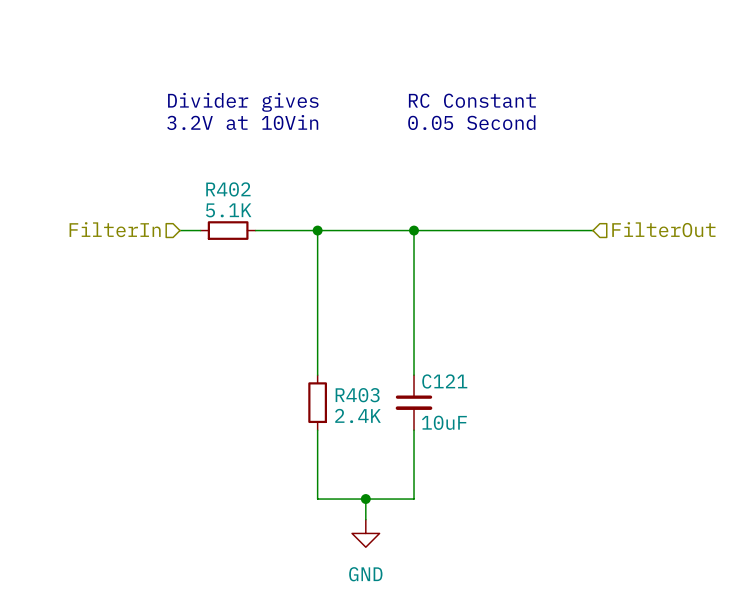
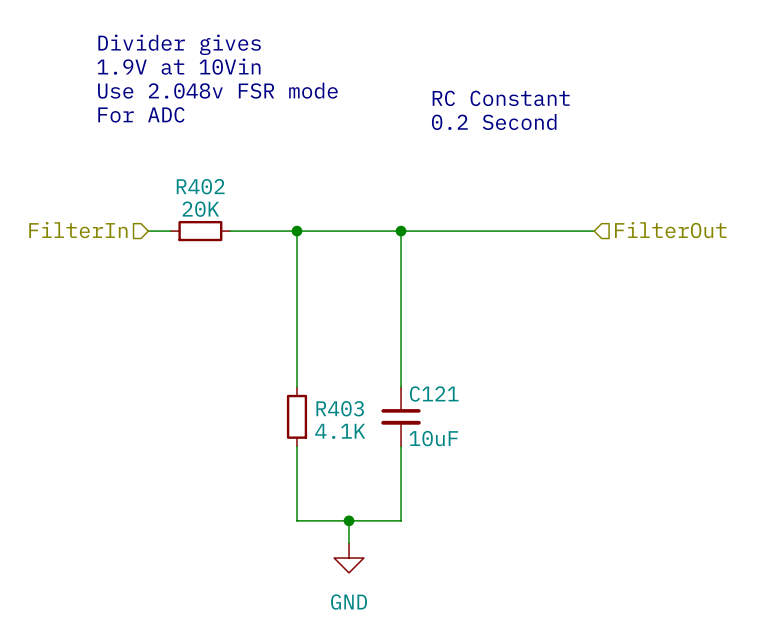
text: none -> 1.9V at 10Vin (179, 66)
text: none -> Use 2.048v FSR mode (217, 90)
text position: RC Constant (472, 100) -> RC Constant (501, 98)
text position: Divider gives (243, 102) -> Divider gives (179, 44)
text: none -> For ADC (141, 114)
text: 3.2V at 10Vin (242, 122) -> none
text: 0.05 Second (471, 122) -> 0.2 Second (494, 121)
R402 value: 5.1K (228, 210) -> 20K (200, 209)
R403 value: 2.4K (357, 415) -> 4.1K (340, 431)

